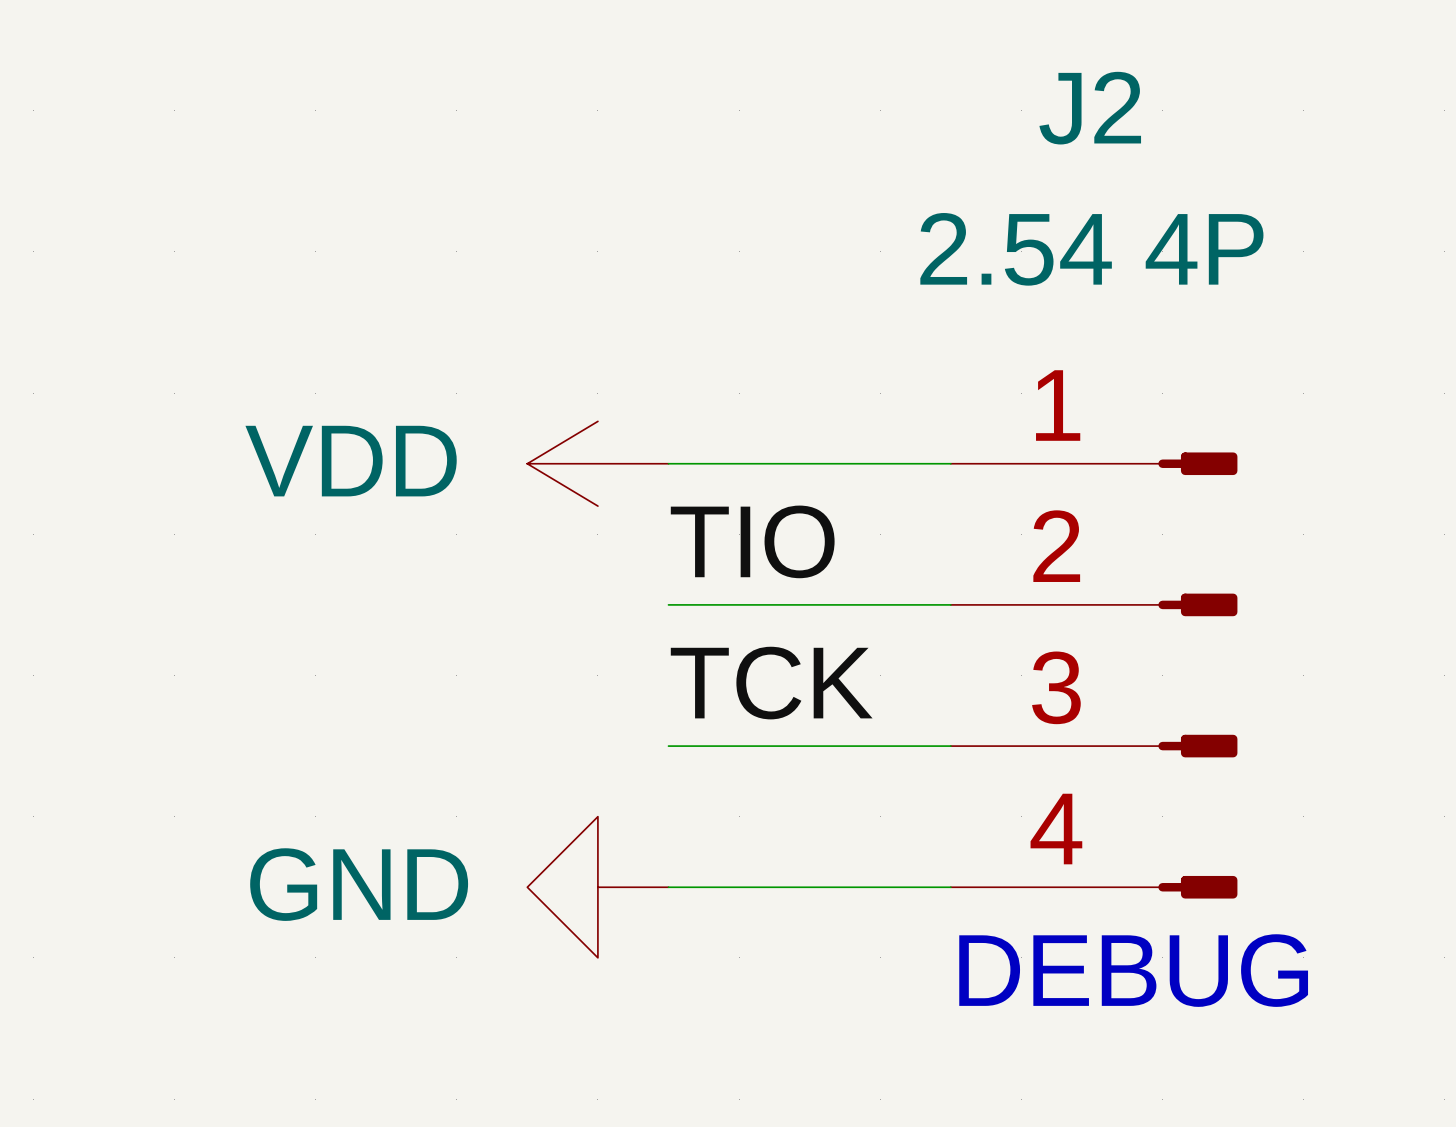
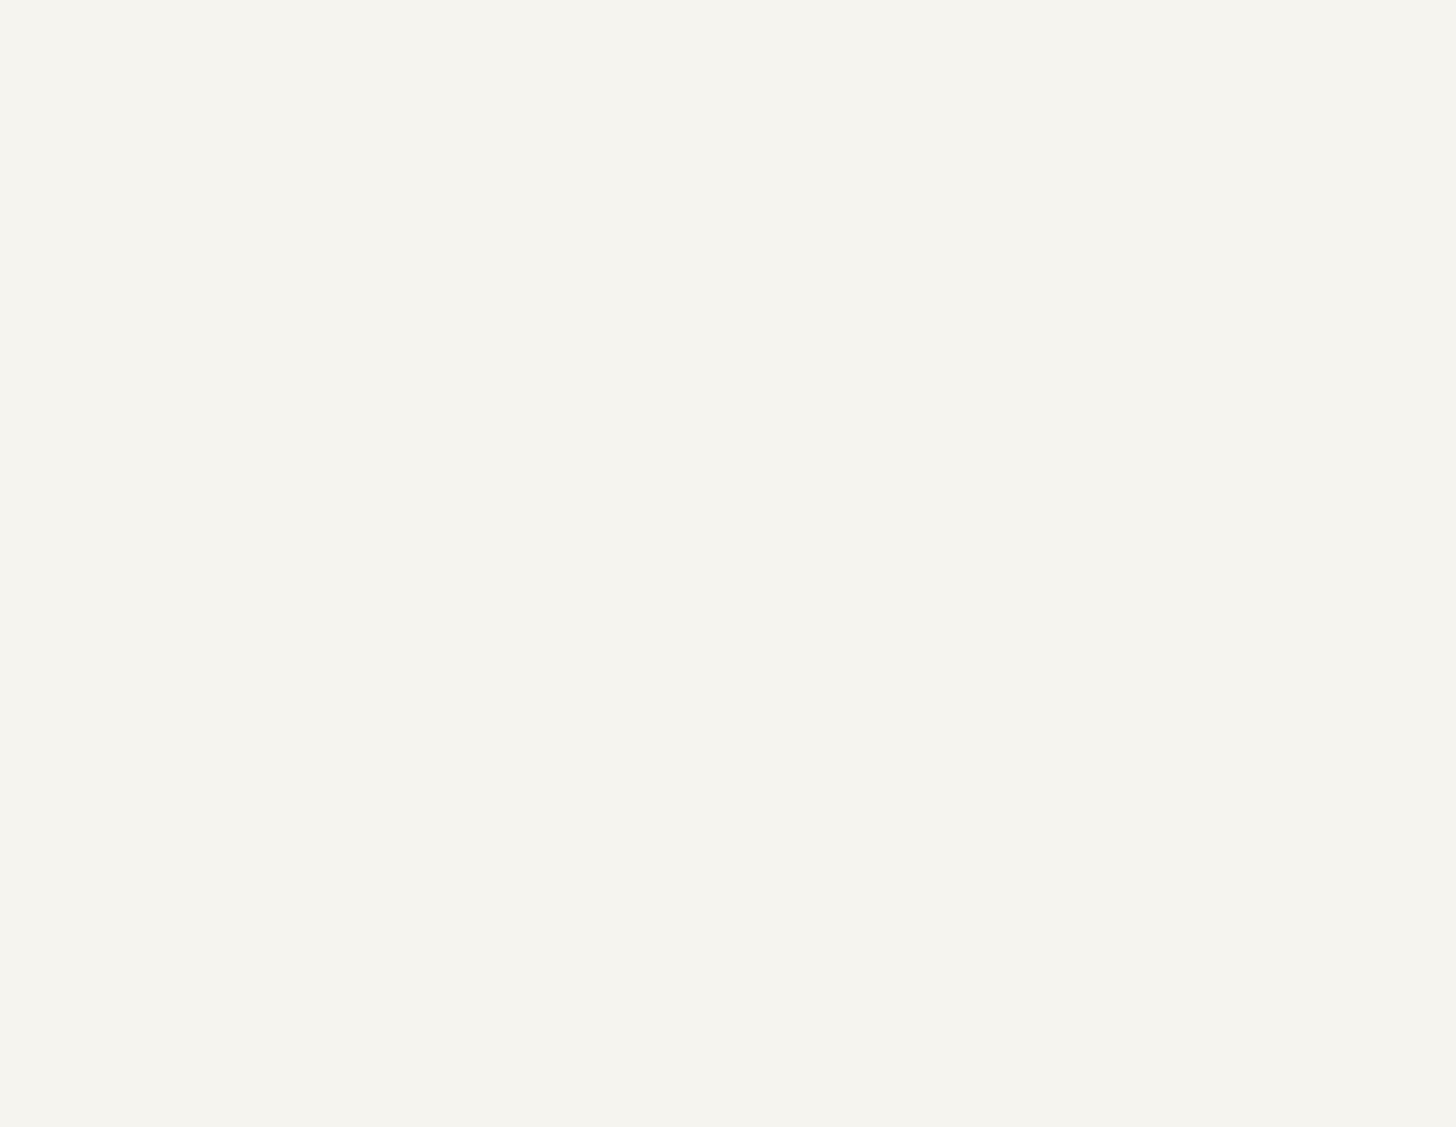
power symbol: VDD (597, 463) -> none
wire: (668, 463) (950, 463) -> none
label: TIO (752, 541) -> none
wire: (668, 604) (950, 604) -> none
J2: 2.54 4P (1094, 675) -> none
label: TCK (771, 683) -> none
wire: (668, 746) (950, 746) -> none
power symbol: GND (597, 887) -> none
wire: (668, 887) (950, 887) -> none
text: DEBUG (1133, 970) -> none

